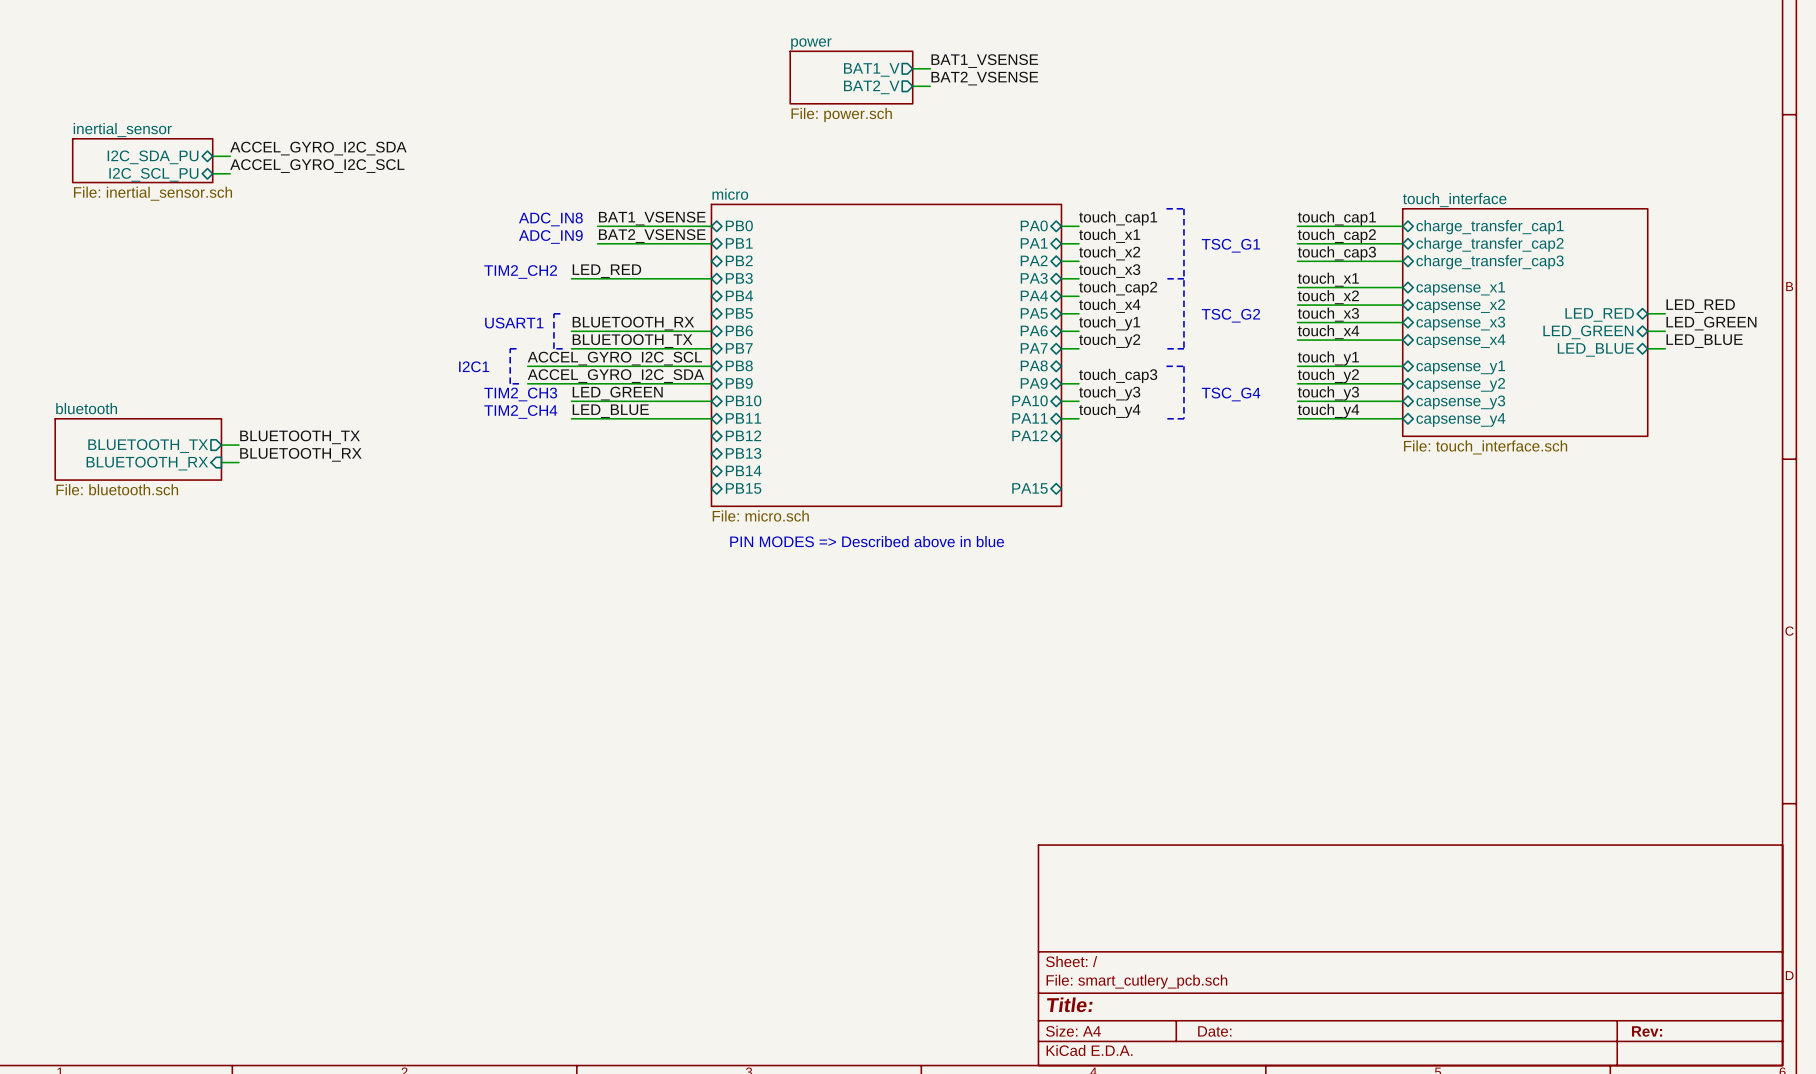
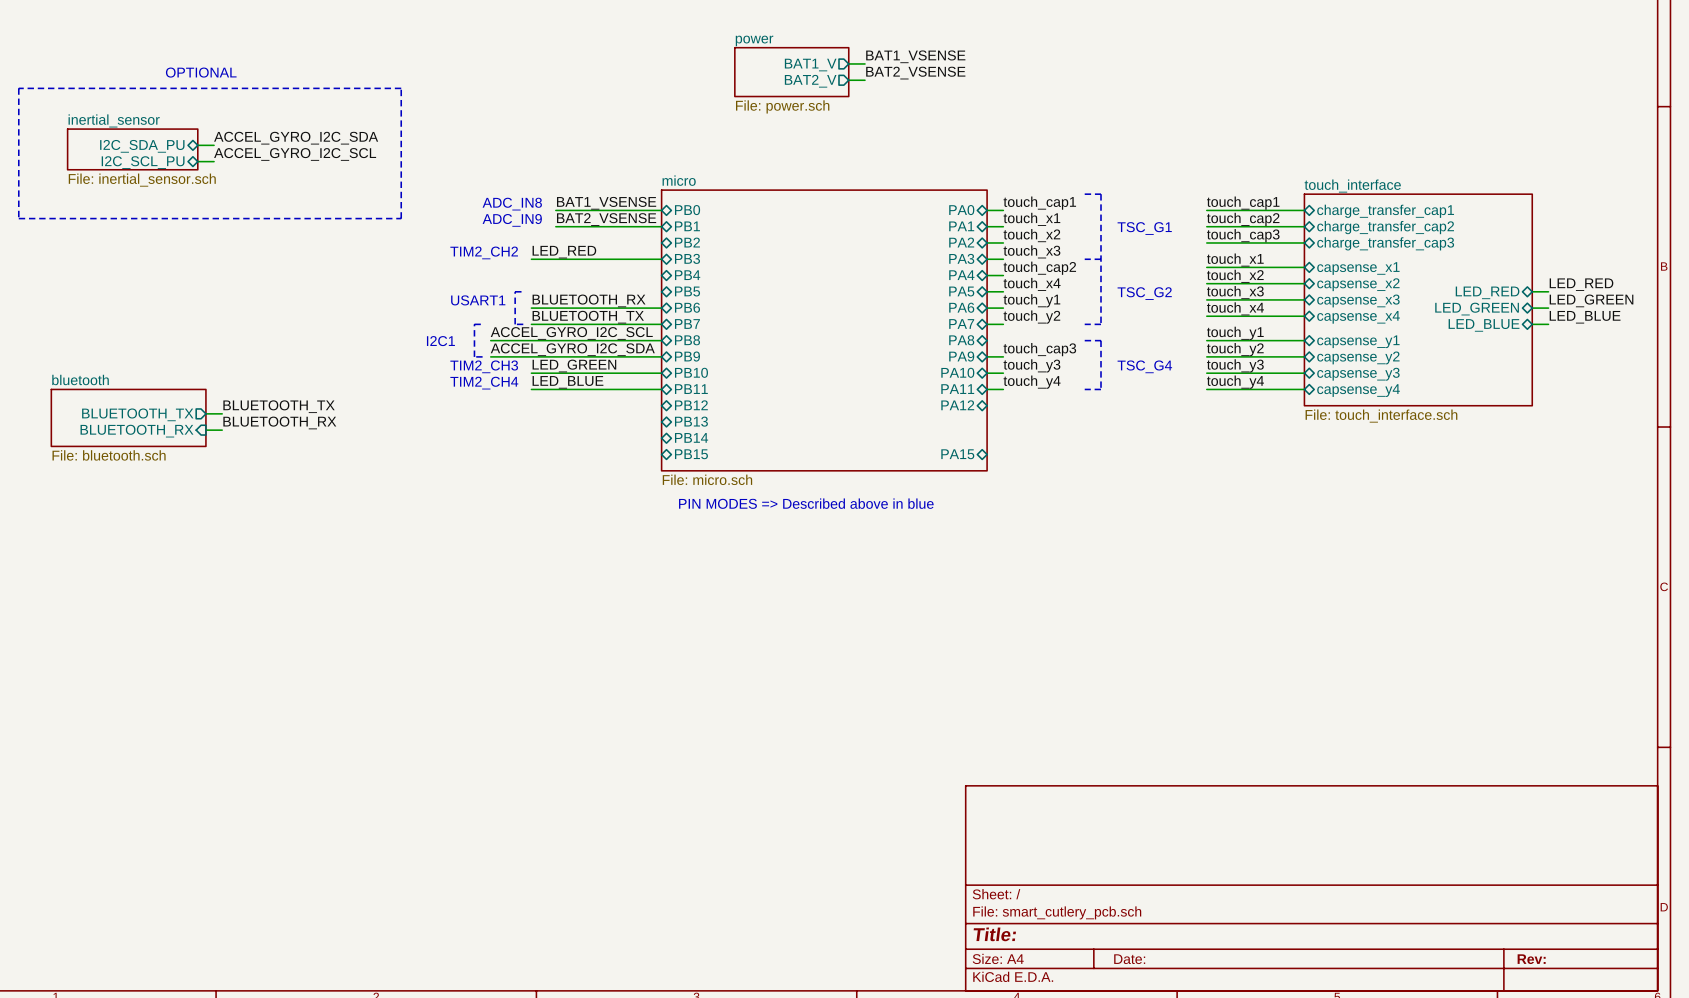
text: none -> OPTIONAL (201, 72)
line: none -> (18, 88) (18, 218) (401, 218) (401, 88) (18, 88)

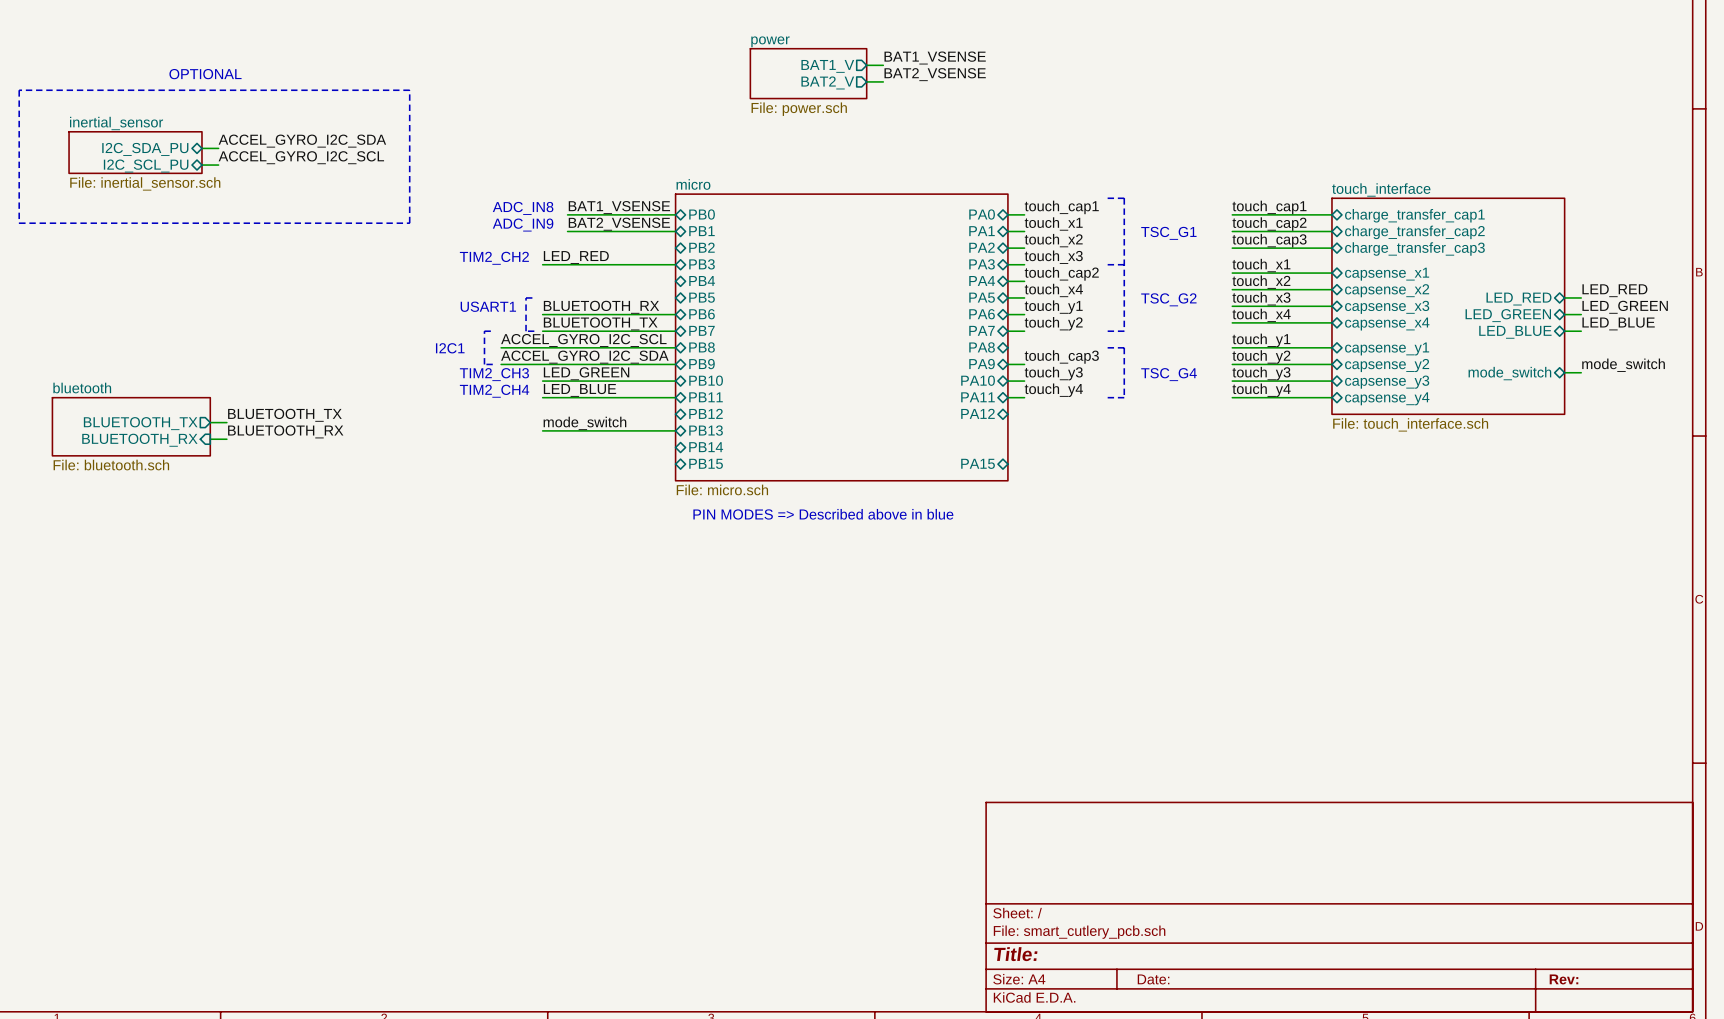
label: none -> mode_switch (1623, 365)
sheet pin: none -> mode_switch (1509, 373)
wire: none -> (1564, 372) (1581, 372)
label: none -> mode_switch (584, 423)
wire: none -> (542, 430) (675, 430)

